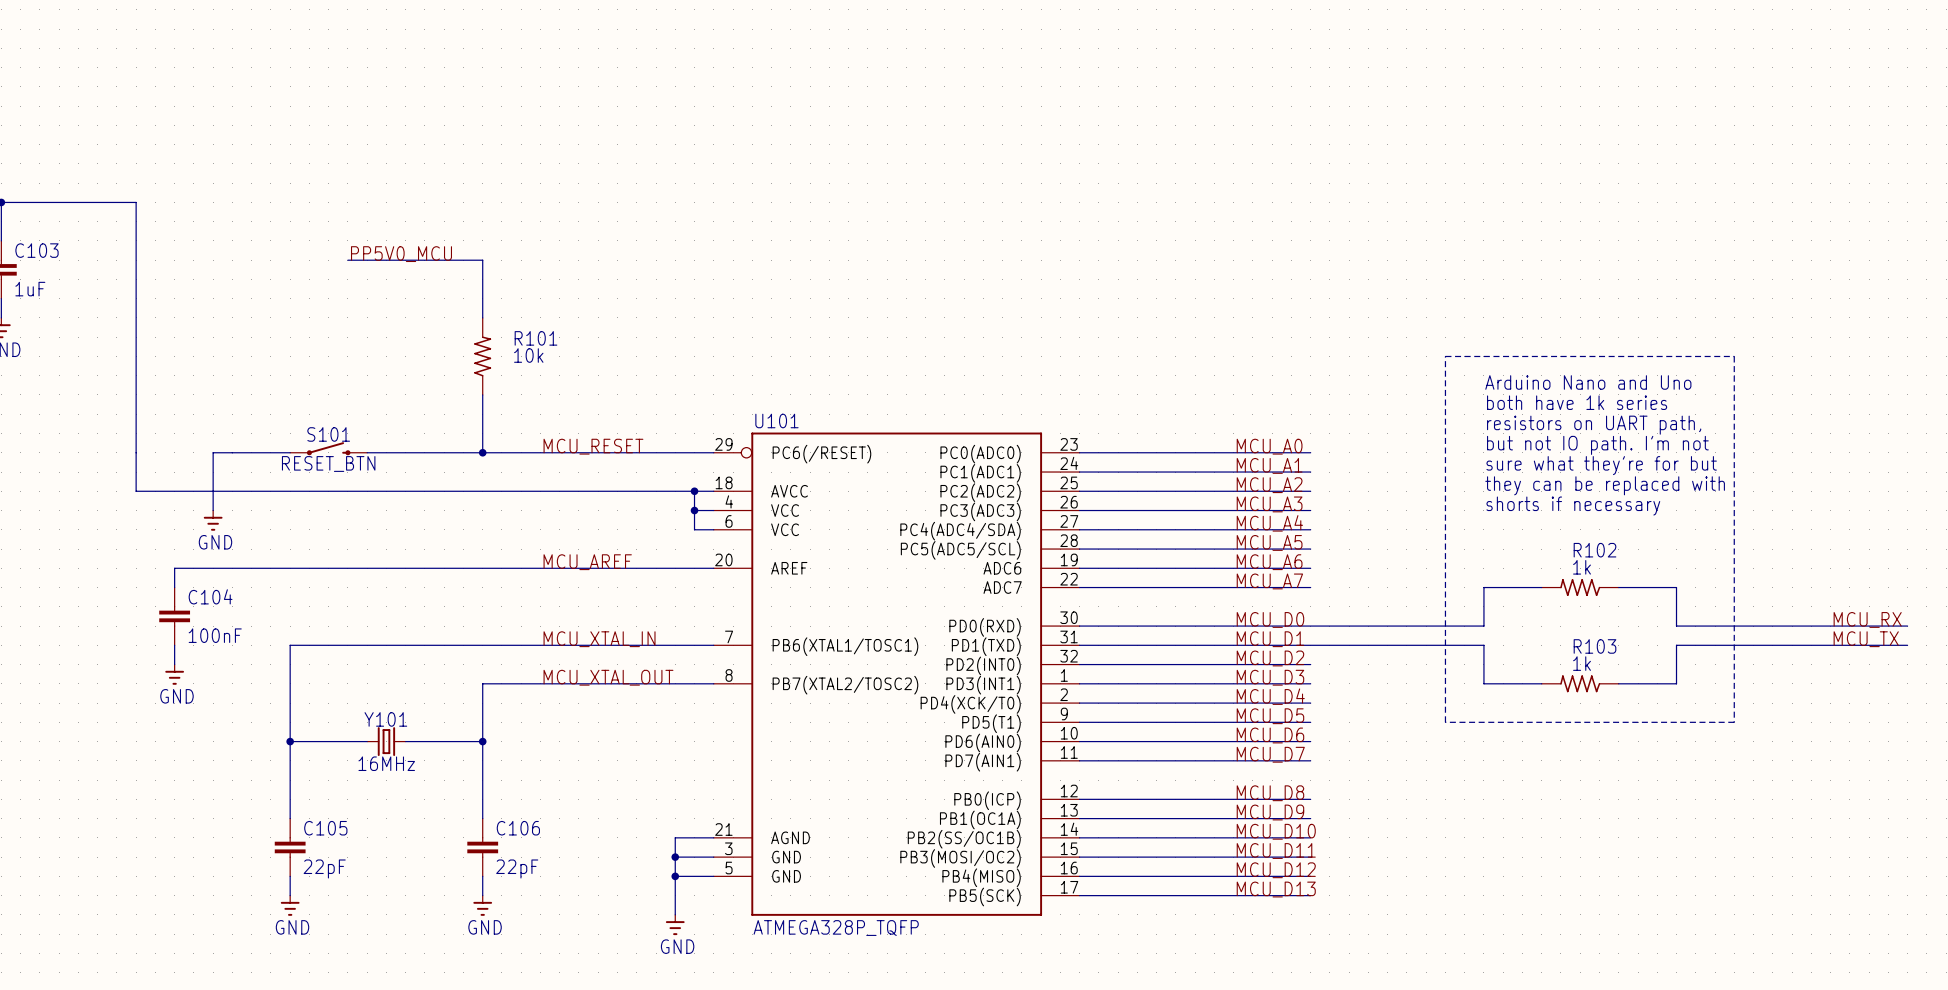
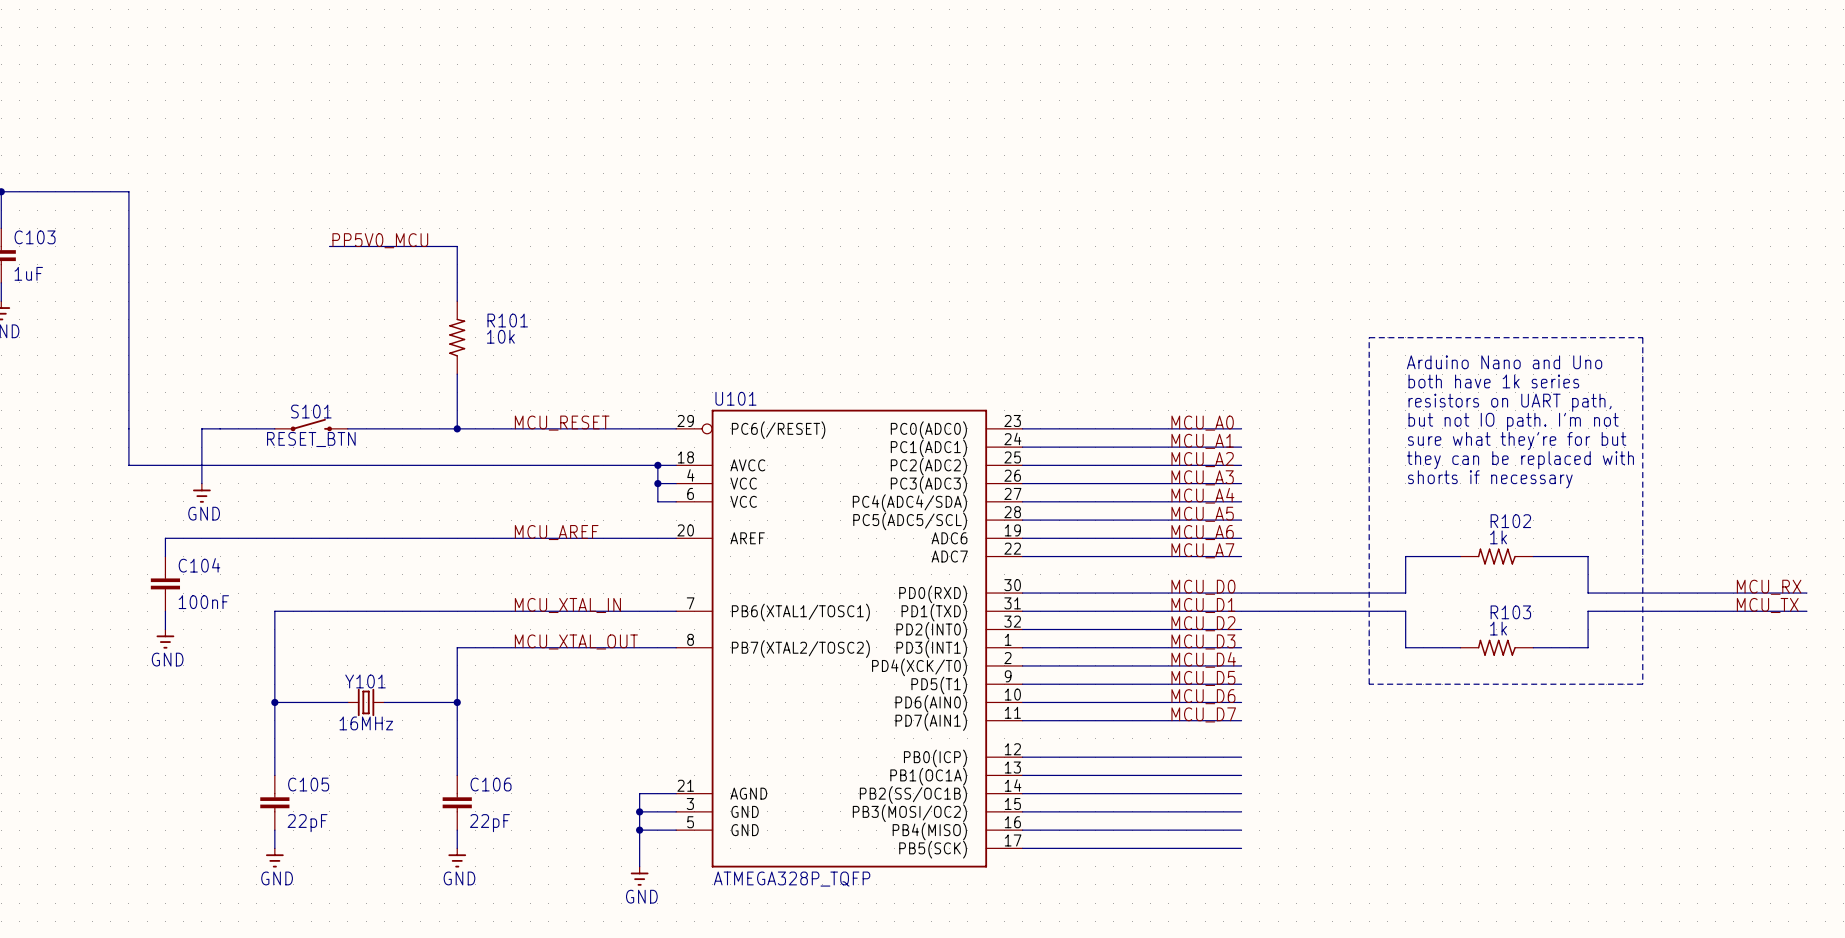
label: MCU_D8 (1270, 793) -> none
label: MCU_D9 (1270, 812) -> none
label: MCU_D10 (1276, 831) -> none
label: MCU_D11 (1276, 851) -> none
label: MCU_D12 (1276, 870) -> none
label: MCU_D13 (1276, 889) -> none

